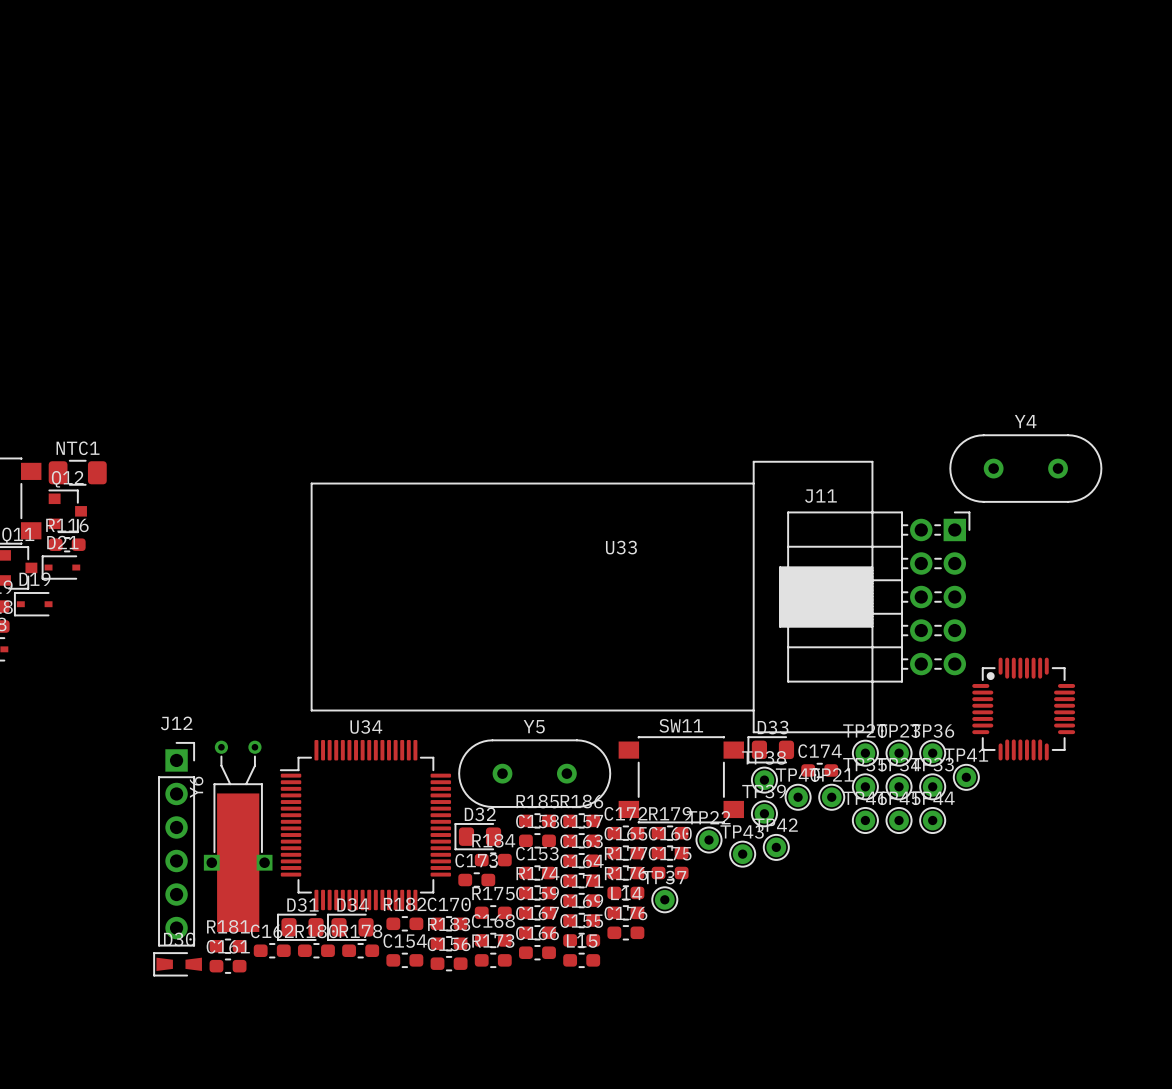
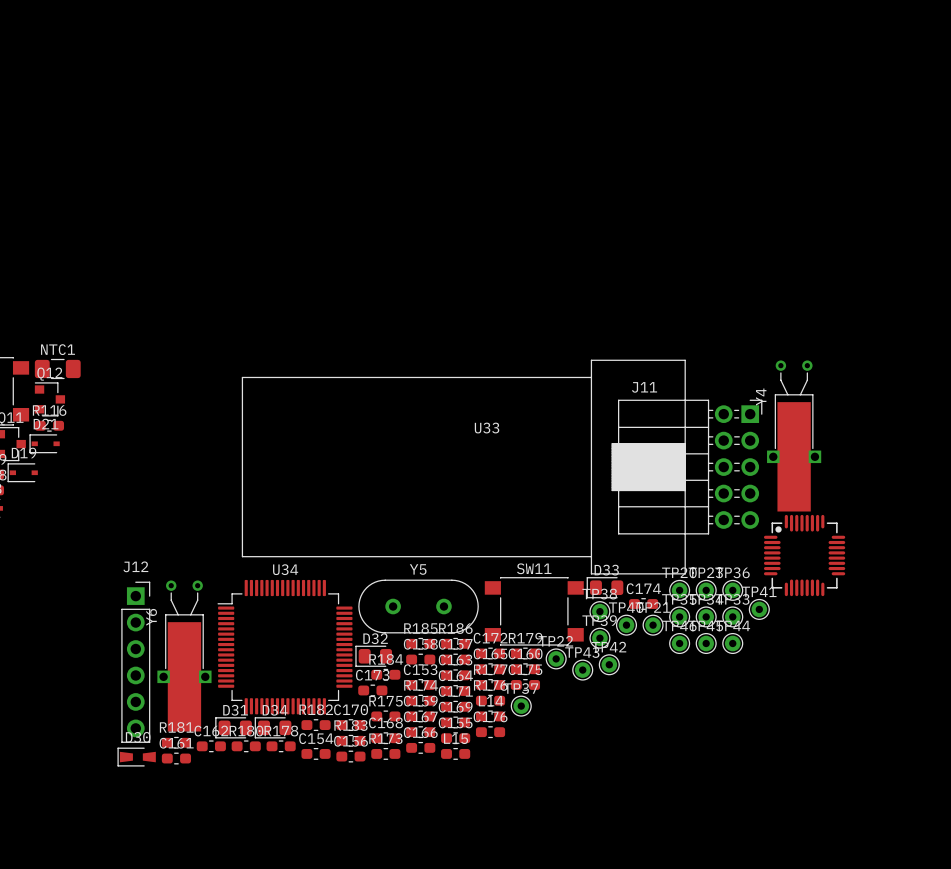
Y4 name position: Y4 (1025, 421) -> Y4 (761, 397)
Y4 footprint: [949, 434, 1103, 503] -> [767, 360, 822, 512]

